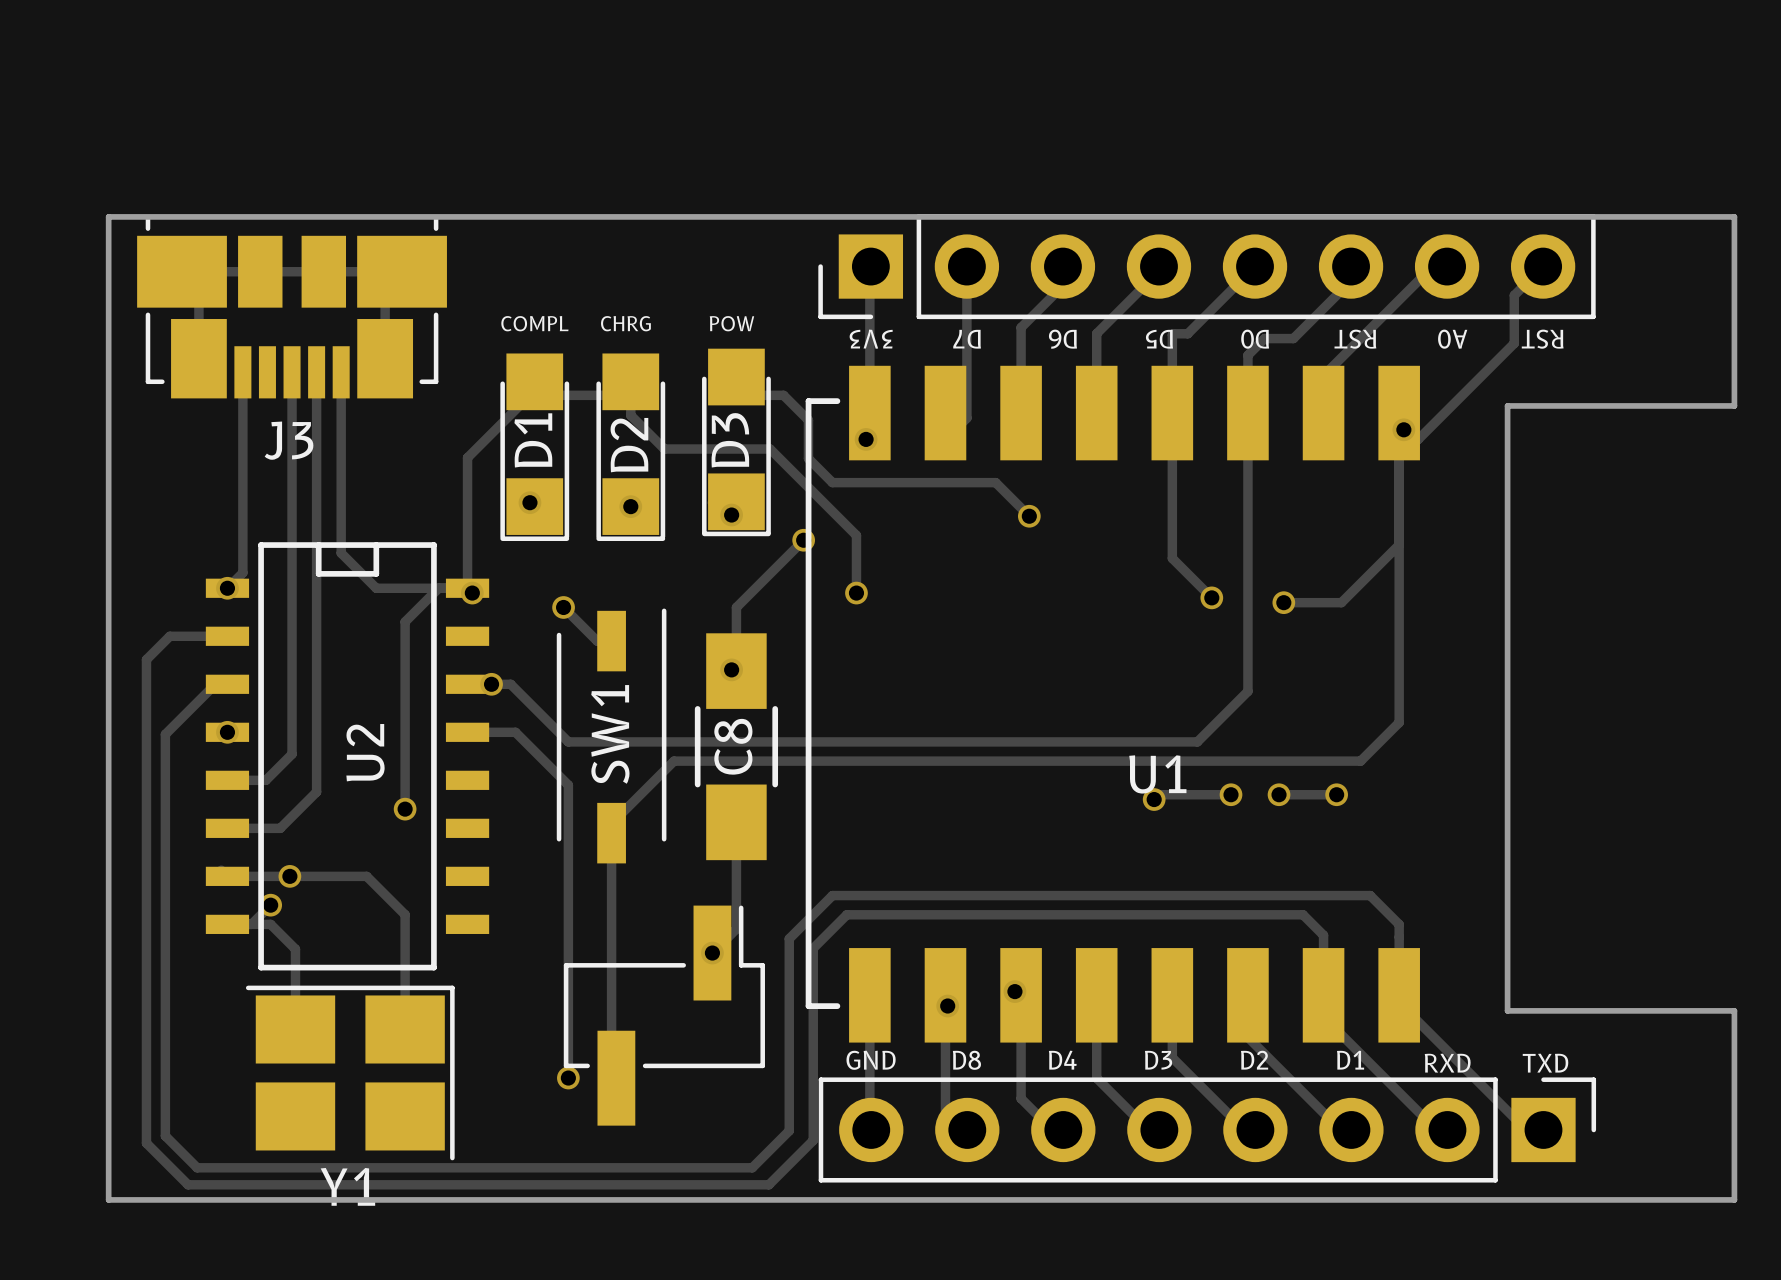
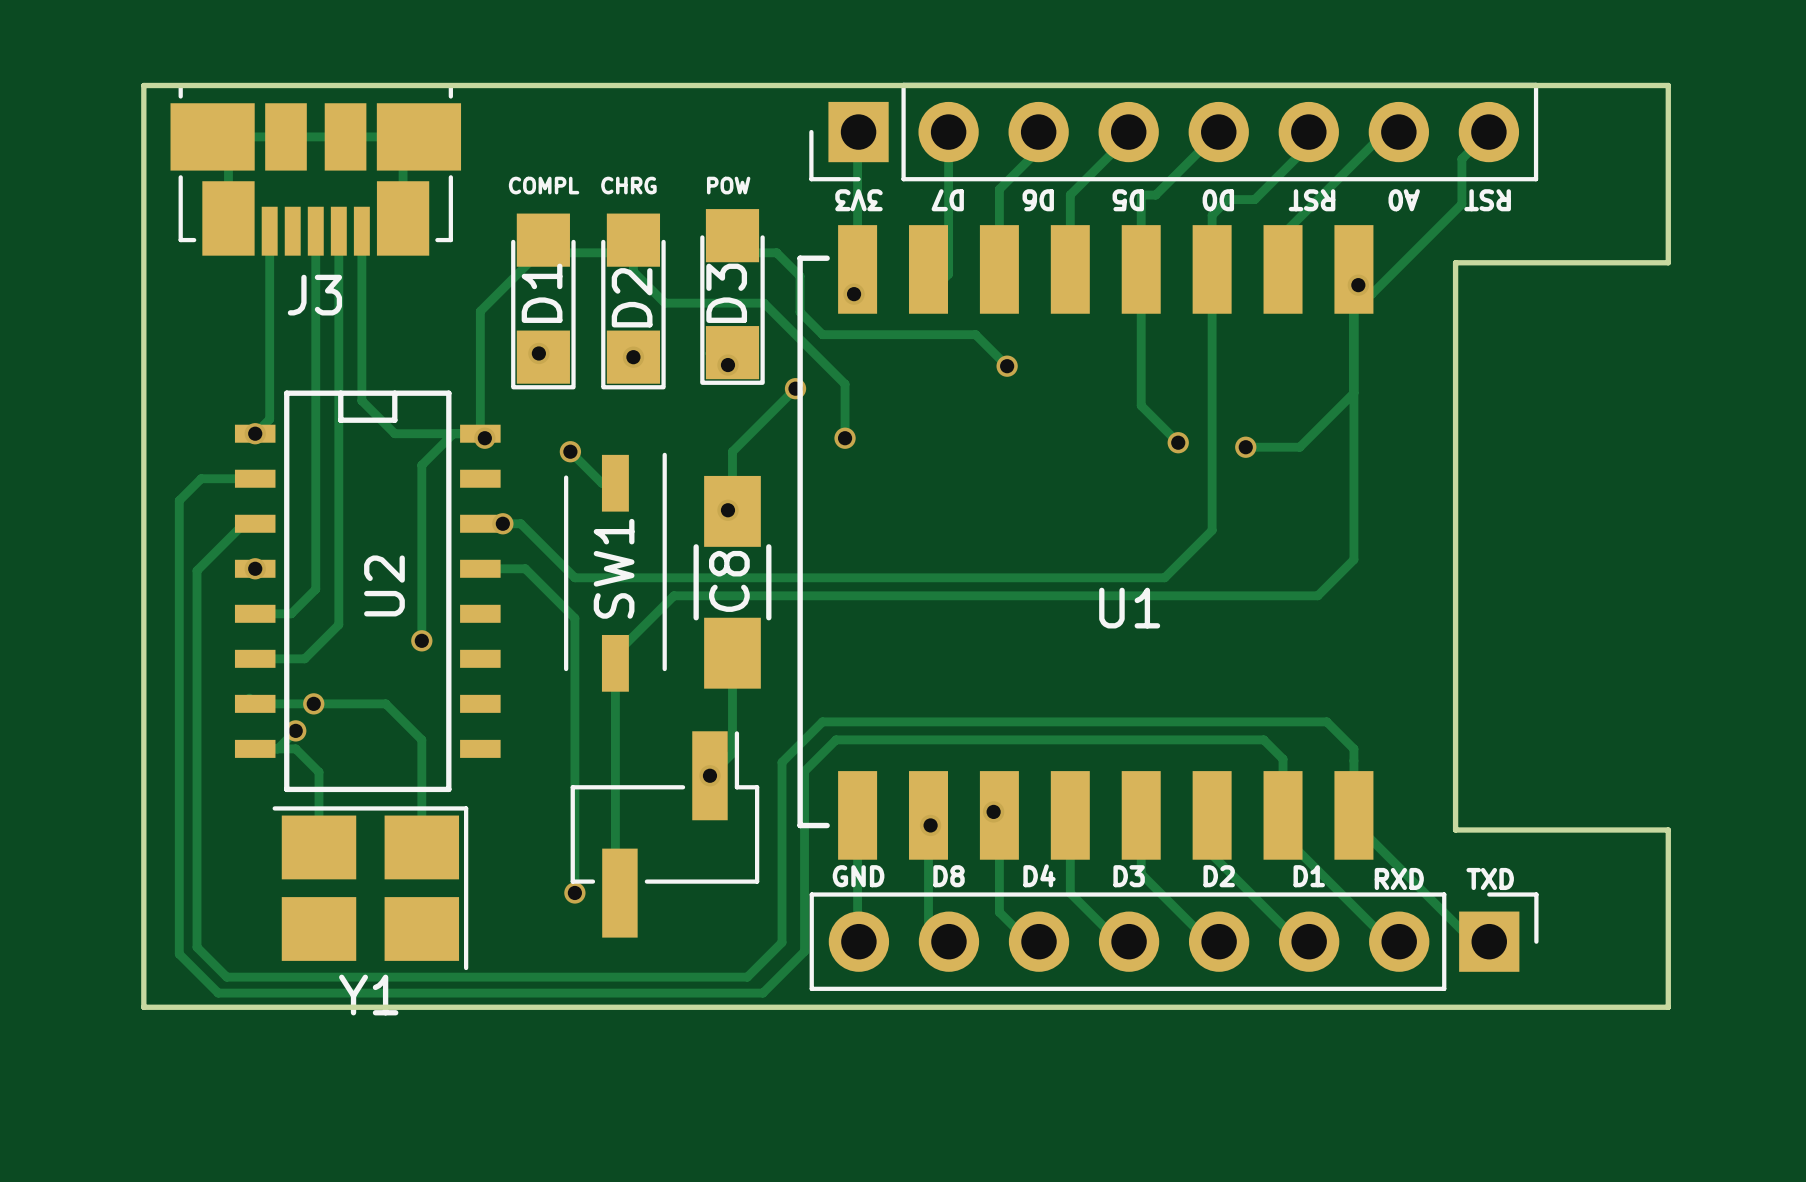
track: (1231, 794) (1158, 794) (1154, 799) -> none
via: (1231, 794) -> none
track: (1279, 794) (1336, 794) -> none
via: (1279, 794) -> none
via: (1336, 794) -> none
via: (1154, 799) -> none

